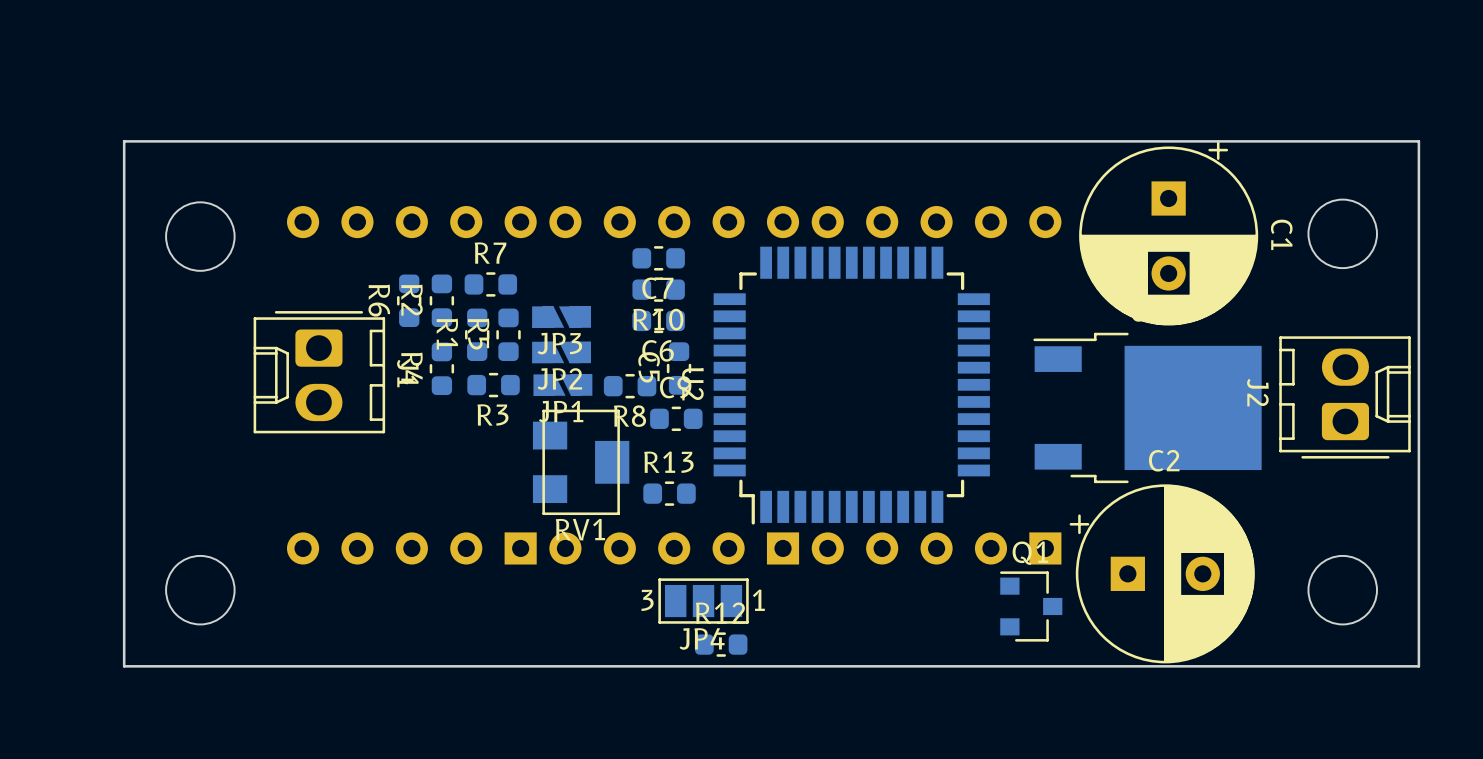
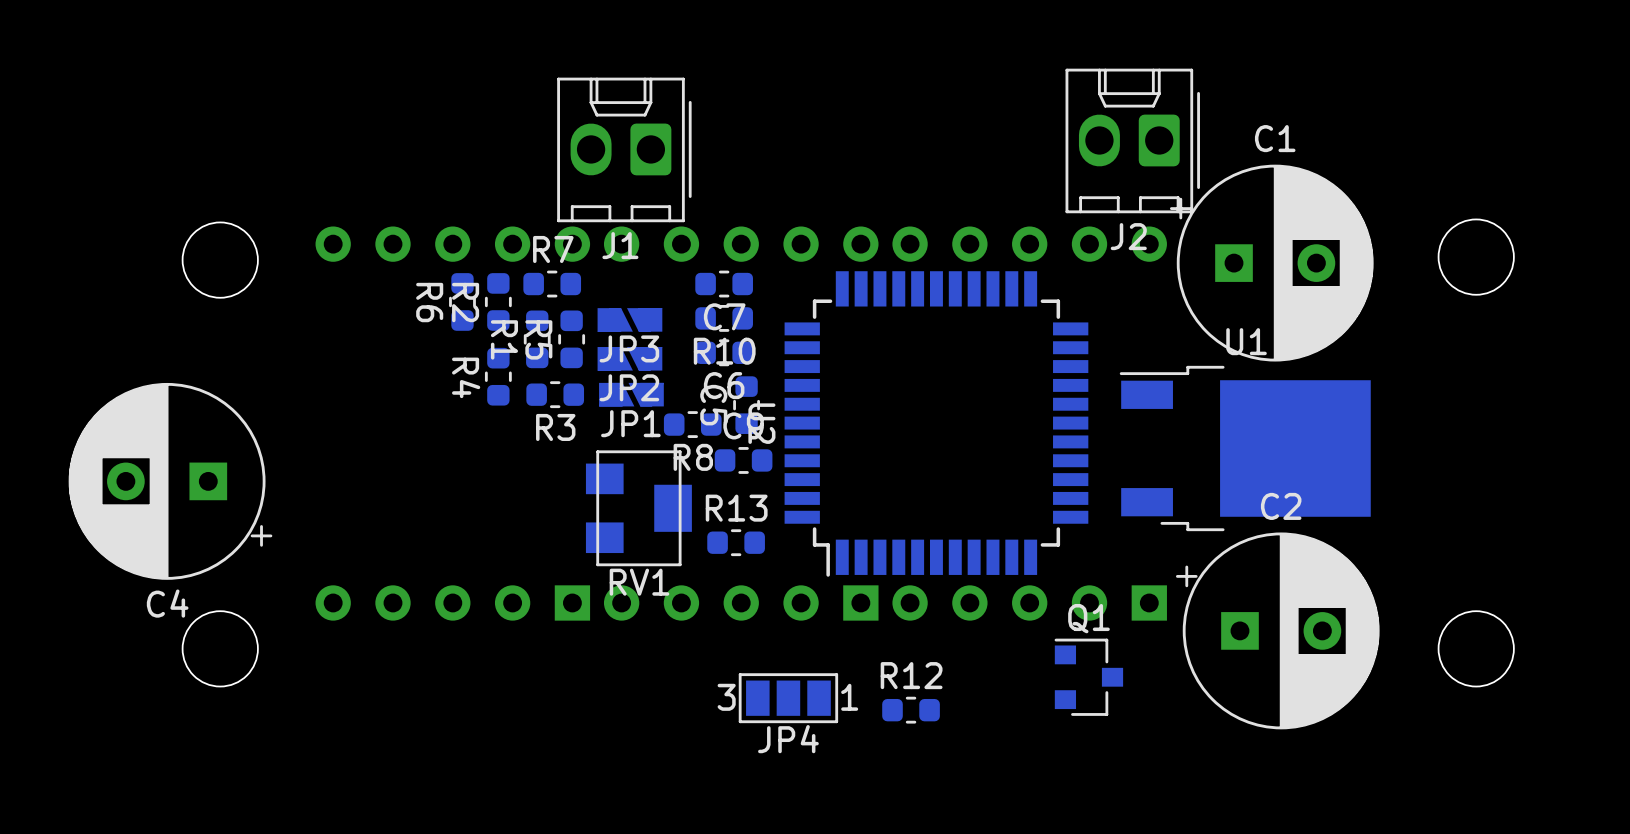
board edge: (1418, 141) (1418, 666) (124, 666) (124, 141) (1418, 141) -> none
C1 rotation: 0° (1168, 232) -> 90° counterclockwise (1271, 263)
R7 position: (490, 284) -> (552, 284)
R6 position: (409, 300) -> (462, 301)
R2 position: (441, 300) -> (498, 301)
JP3 position: (561, 317) -> (629, 319)
R1 position: (477, 334) -> (537, 339)
R5 position: (508, 334) -> (571, 339)
JP2 position: (561, 352) -> (629, 358)
R4 position: (441, 368) -> (498, 376)
J1 rotation: 0° (319, 372) -> 90° clockwise (624, 149)
J1 position: (319, 372) -> (624, 149)
R3 position: (493, 385) -> (555, 394)
JP1 position: (562, 385) -> (631, 394)
J2 rotation: 0° (1345, 397) -> 90° counterclockwise (1132, 140)
J2 position: (1345, 397) -> (1132, 140)
U1 position: (1147, 407) -> (1245, 448)
C4: none -> (170, 481)
JP4 position: (703, 601) -> (788, 698)
Q1 position: (1031, 606) -> (1088, 677)
R12 position: (721, 644) -> (911, 710)

